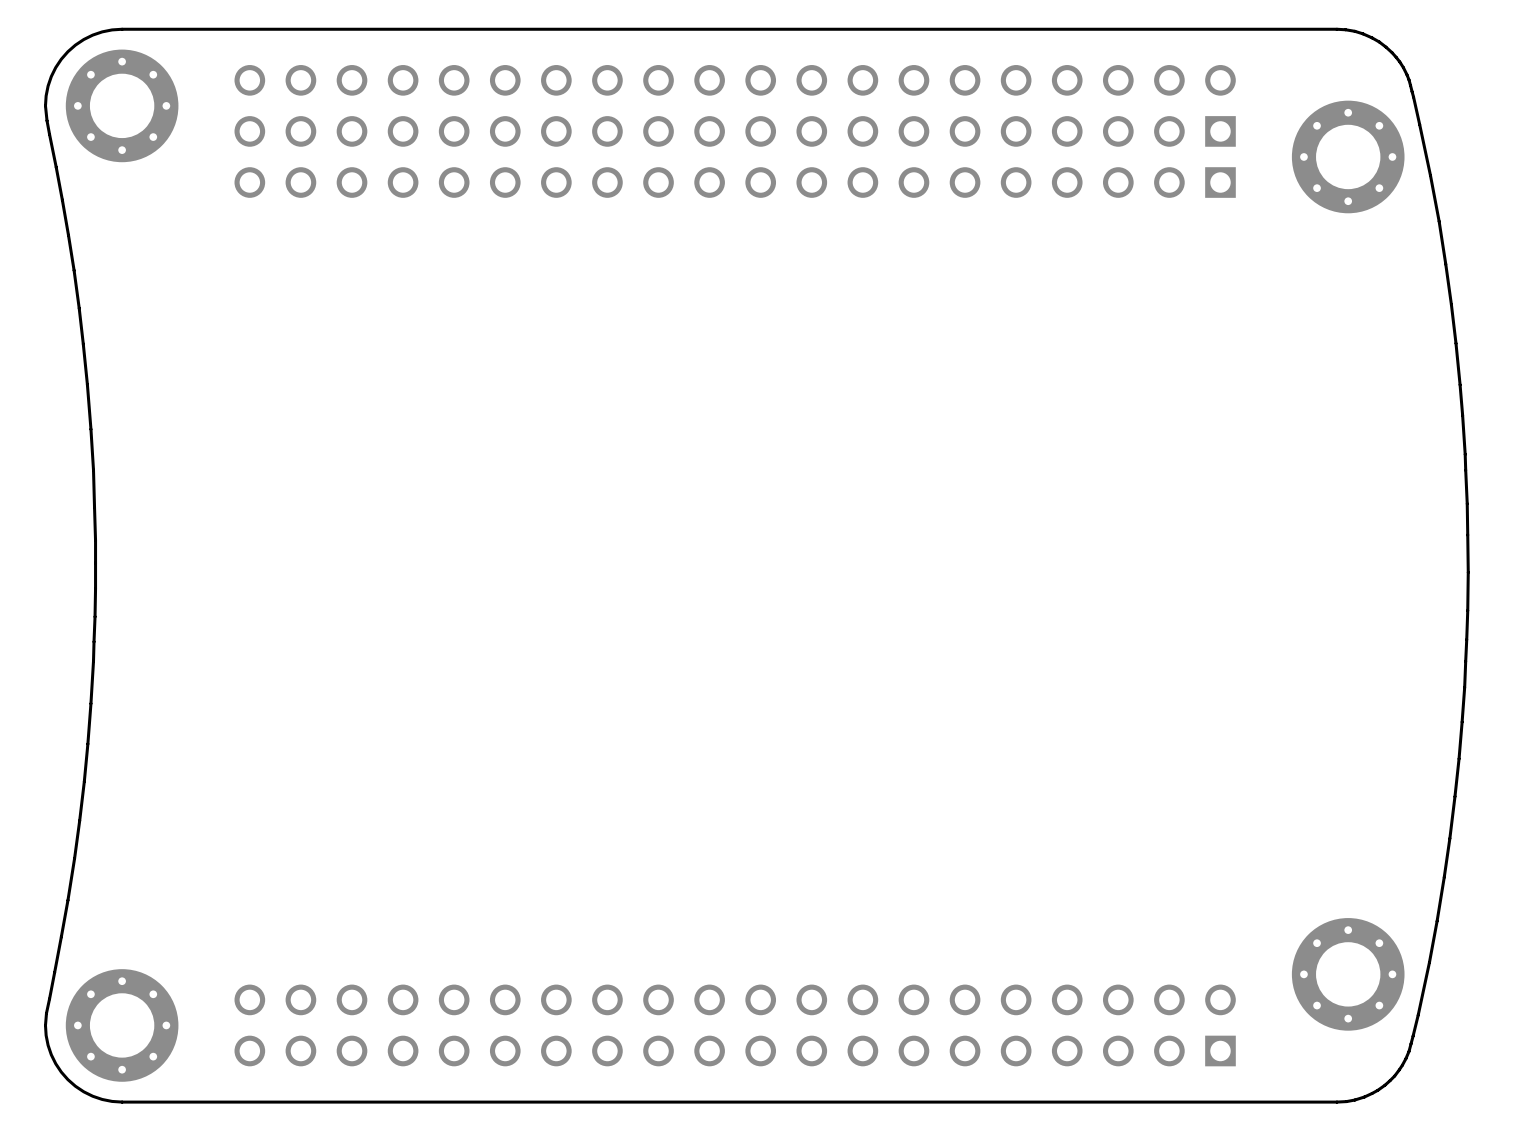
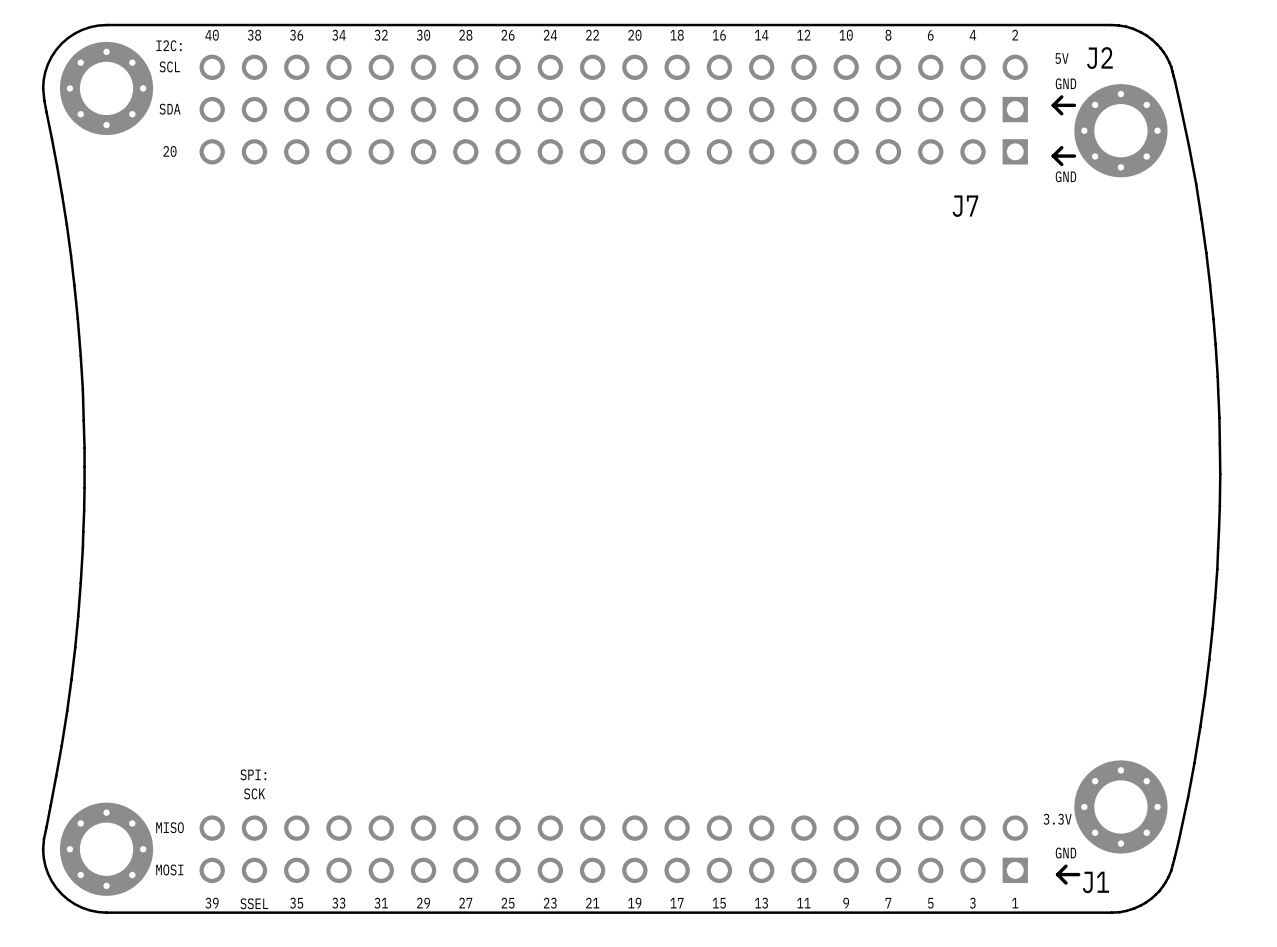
text: none -> 40 (212, 35)
text: none -> 38 (254, 35)
text: none -> 36 (296, 35)
text: none -> 34 (339, 35)
text: none -> 32 (381, 35)
text: none -> 30 (423, 35)
text: none -> 28 (465, 35)
text: none -> 26 (508, 35)
text: none -> 24 (550, 35)
text: none -> 22 (592, 35)
text: none -> 20 (634, 35)
text: none -> 18 (677, 35)
text: none -> 16 (719, 35)
text: none -> 14 (761, 35)
text: none -> 12 (803, 35)
text: none -> 10 (846, 35)
text: none -> 8 (888, 35)
text: none -> 6 (930, 35)
text: none -> 4 (972, 35)
text: none -> 2 (1015, 35)
text: none -> I2C: (169, 45)
text: none -> 5V (1061, 58)
text: none -> J2 (1099, 58)
text: none -> SCL (169, 66)
text: none -> GND (1065, 83)
line: none -> (1061, 96) (1053, 105)
line: none -> (1053, 105) (1061, 113)
line: none -> (1074, 105) (1053, 105)
text: none -> SDA (170, 109)
line: none -> (1061, 147) (1053, 156)
text: none -> 20 (169, 151)
line: none -> (1053, 156) (1061, 164)
line: none -> (1074, 156) (1053, 156)
text: none -> GND (1065, 176)
text: none -> J7 (965, 206)
text: none -> SPI: (253, 774)
text: none -> SCK (254, 793)
text: none -> 3.3V (1057, 819)
text: none -> MISO (170, 827)
text: none -> GND (1065, 853)
line: none -> (1065, 866) (1057, 874)
text: none -> MOSI (169, 869)
line: none -> (1057, 874) (1065, 883)
line: none -> (1078, 874) (1057, 874)
text: none -> J1 (1095, 882)
text: none -> 39 (212, 903)
text: none -> 35 (296, 903)
text: none -> 33 (338, 903)
text: none -> 31 (381, 903)
text: none -> 29 (423, 903)
text: none -> 27 (465, 903)
text: none -> 25 (508, 903)
text: none -> 23 (550, 903)
text: none -> 21 (592, 903)
text: none -> 19 (634, 903)
text: none -> 17 (677, 903)
text: none -> 15 (719, 903)
text: none -> 13 (761, 903)
text: none -> 11 (803, 903)
text: none -> 9 (846, 903)
text: none -> 7 (888, 903)
text: none -> 5 (930, 903)
text: none -> 3 (972, 903)
text: none -> 1 (1015, 903)
text: none -> SSEL (254, 903)

